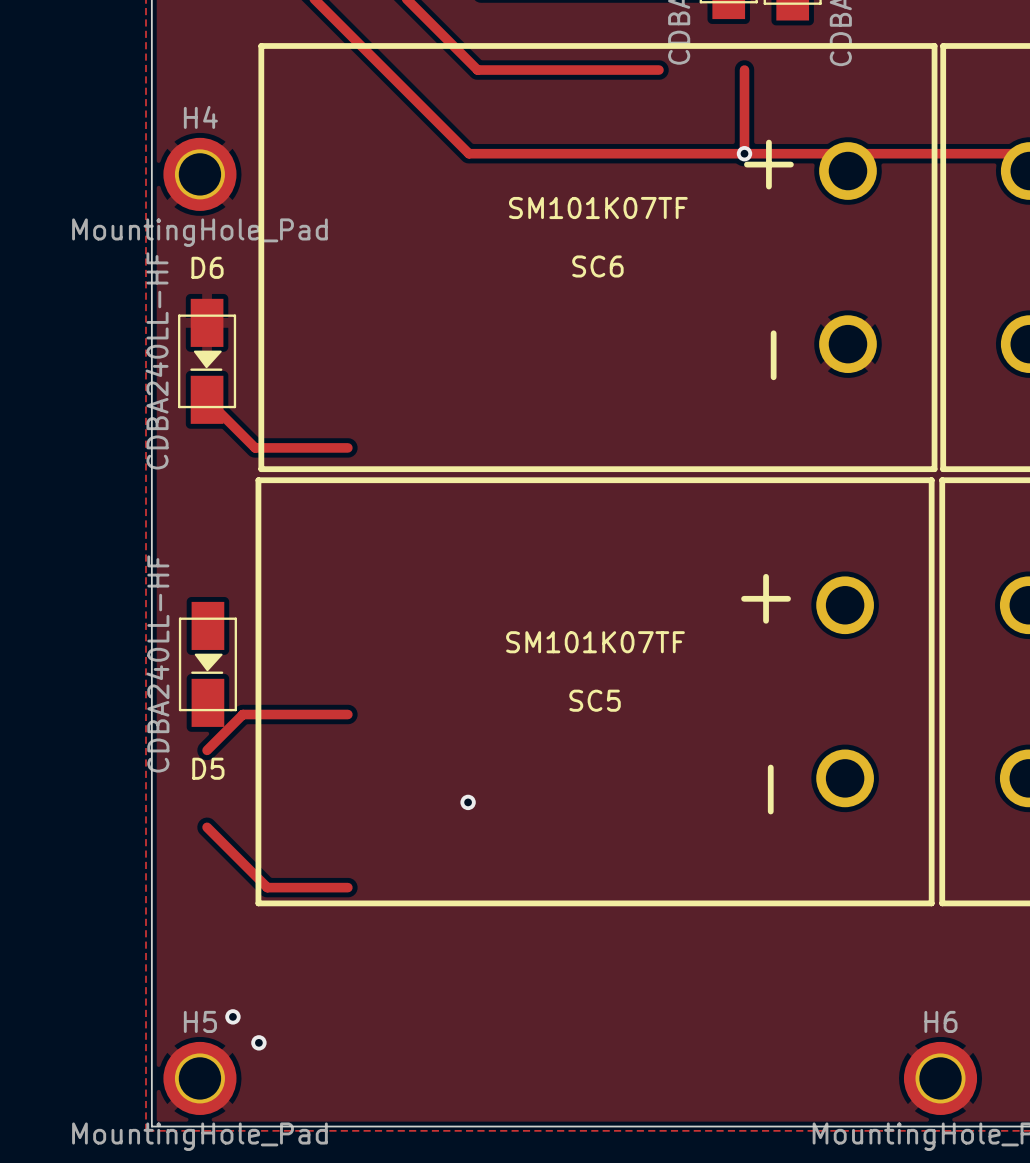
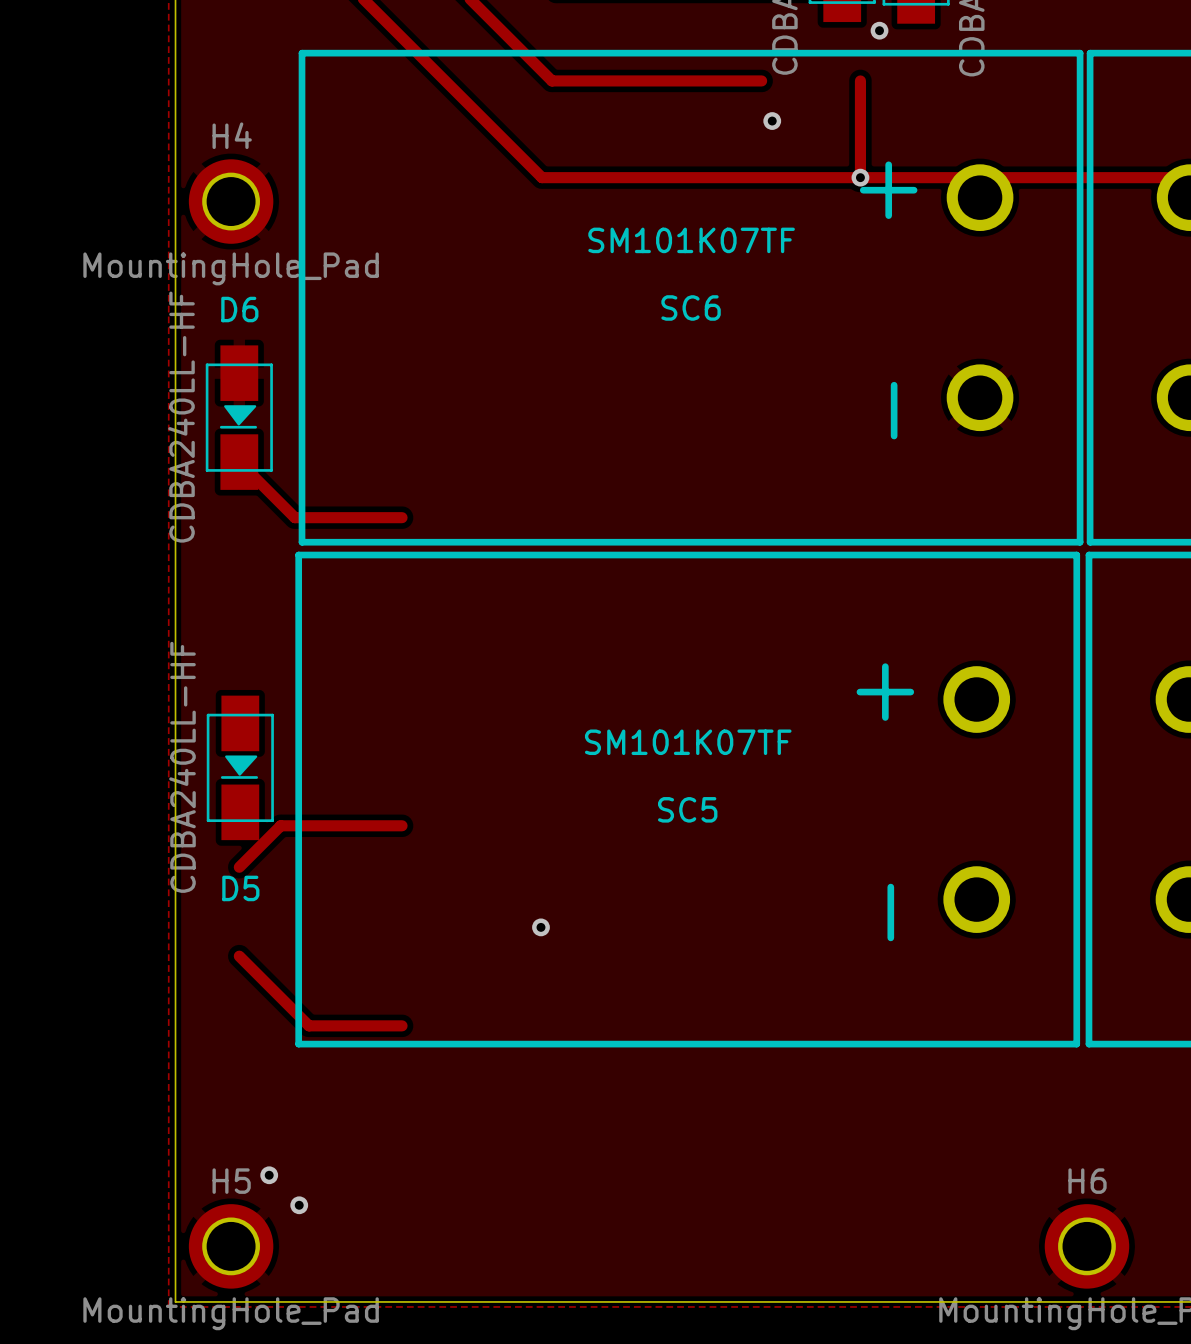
via: none -> (879, 30)
via: none -> (772, 121)

